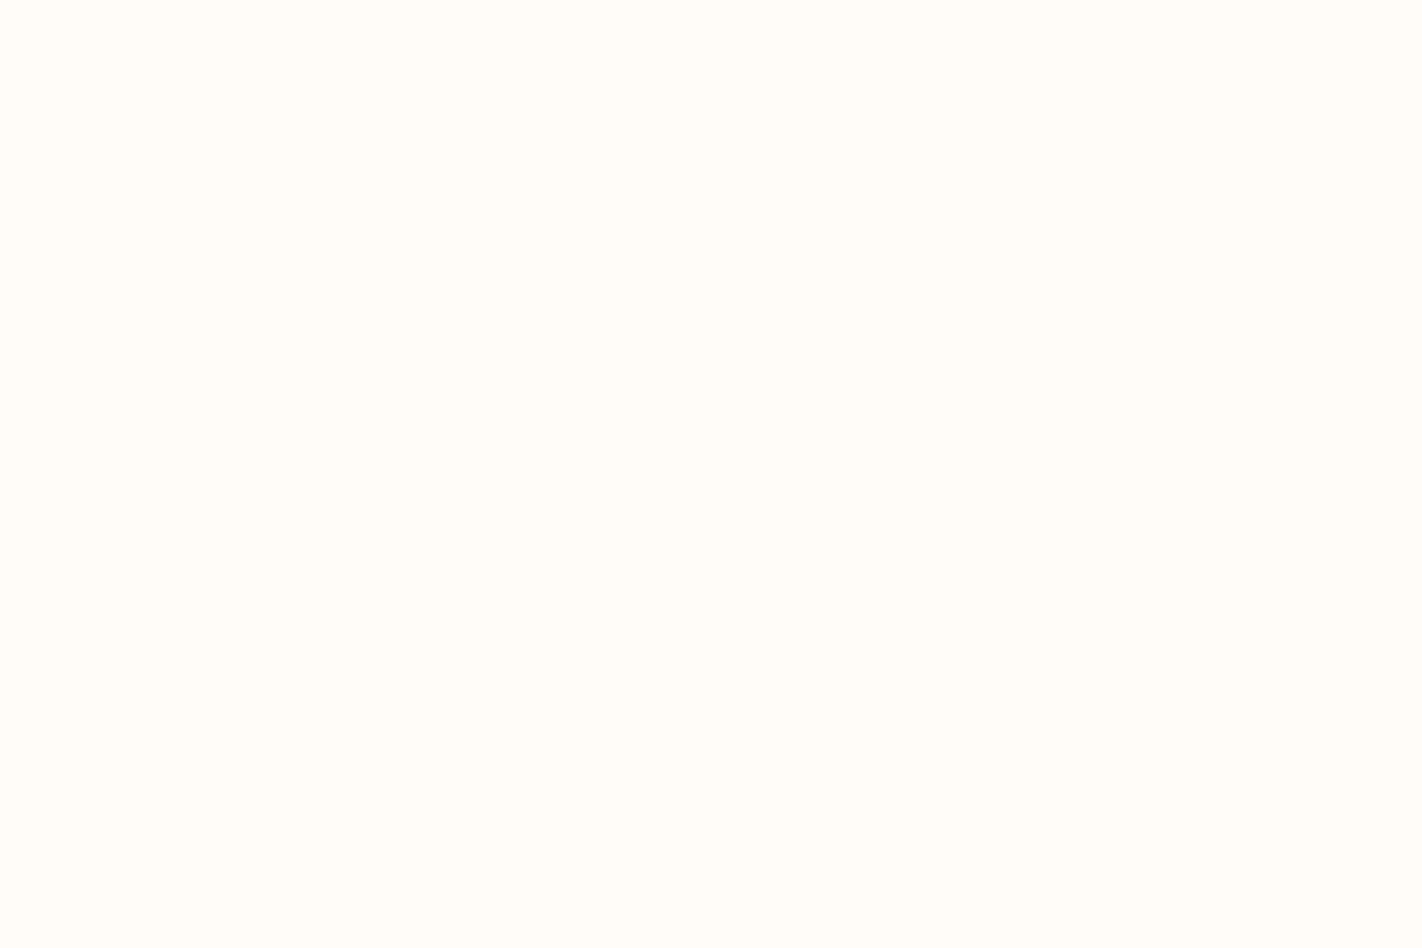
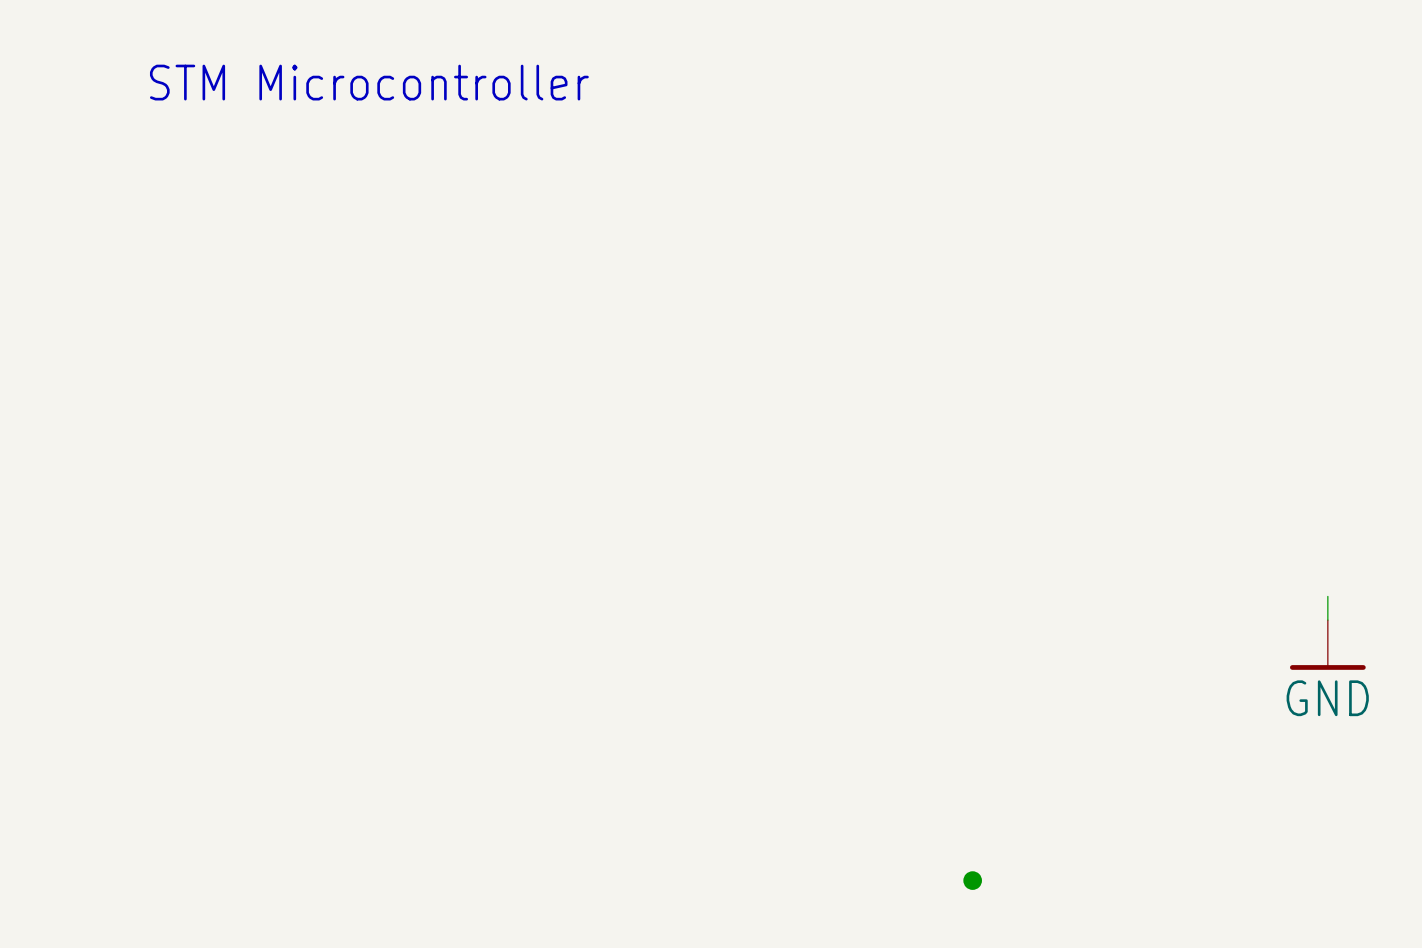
text: none -> STM Microcontroller (369, 82)
wire: none -> (1327, 596) (1327, 620)
power symbol: none -> GND (1327, 644)
junction: none -> (972, 880)

